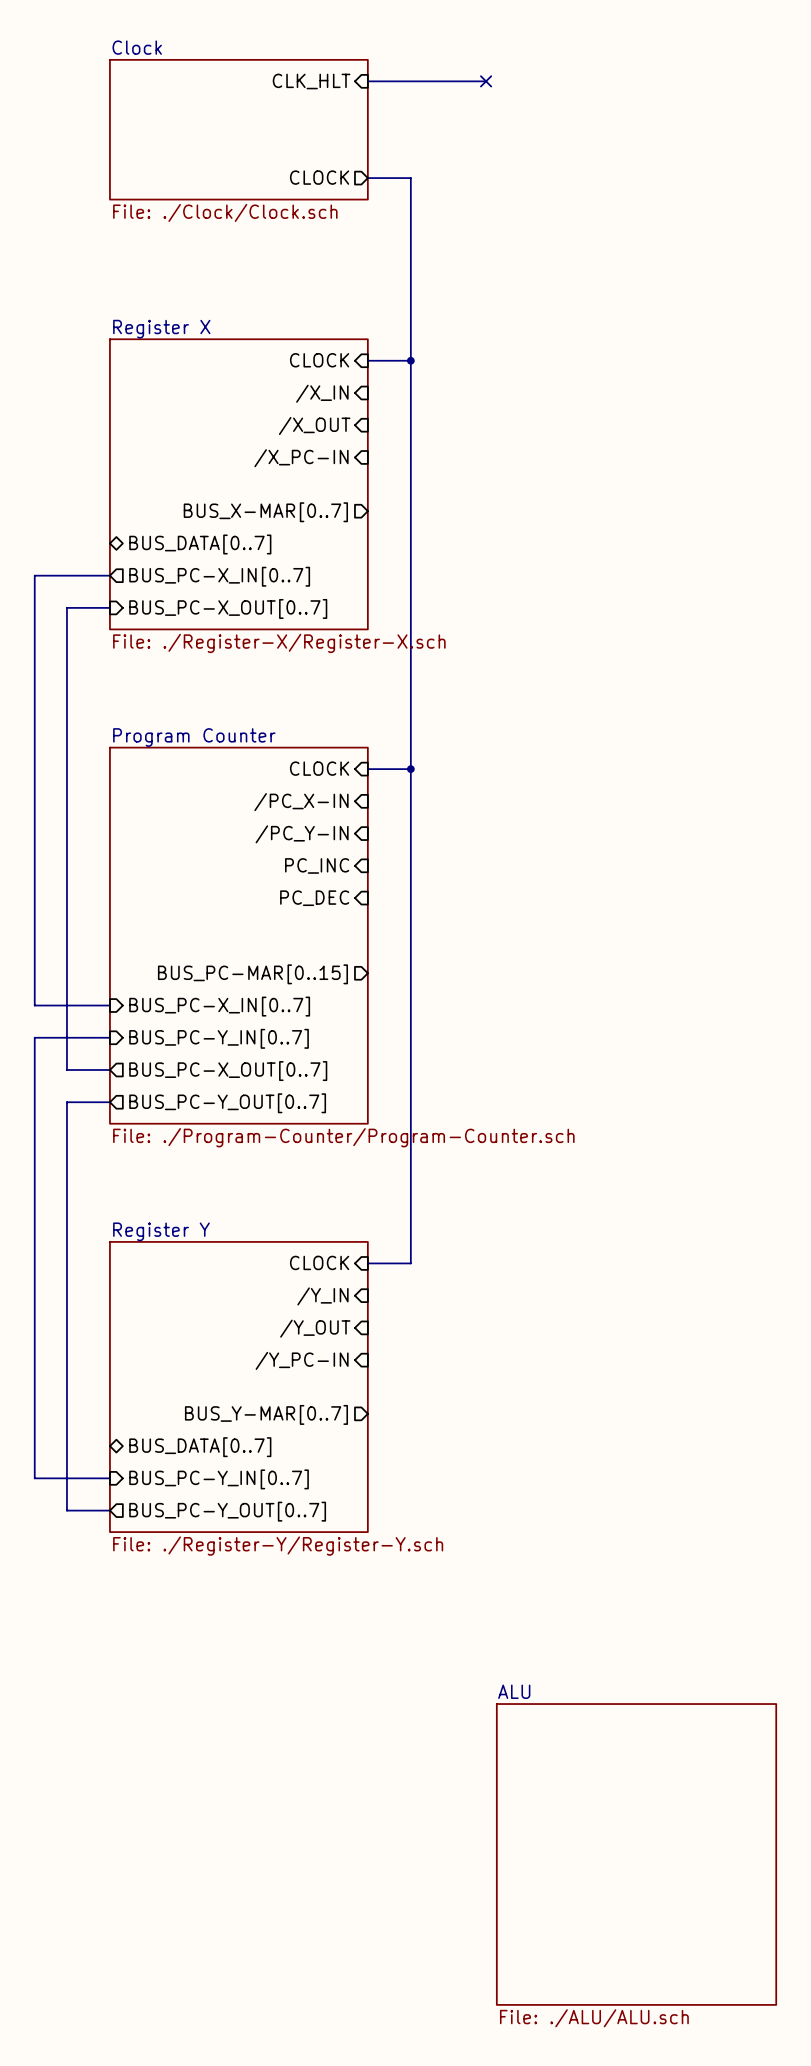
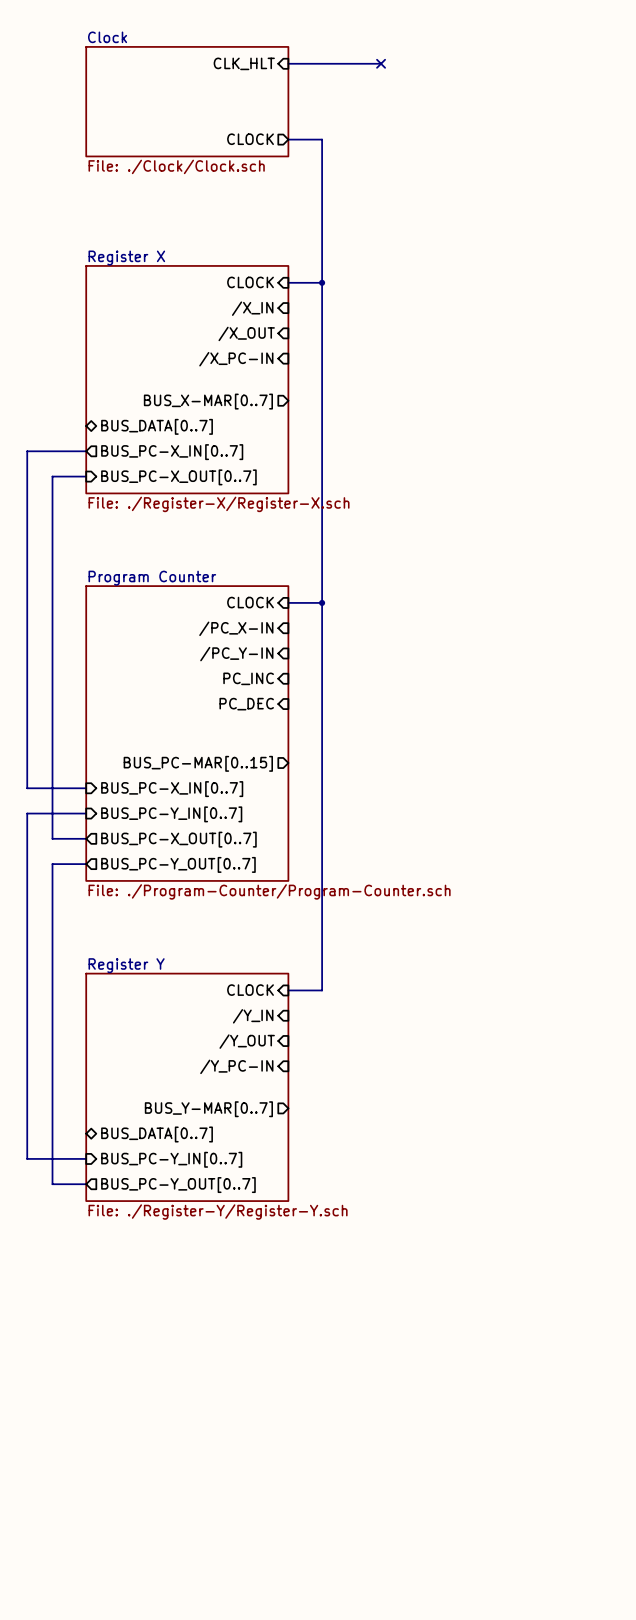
sheet ALU: File: ./ALU/ALU.sch (636, 1854) -> none

